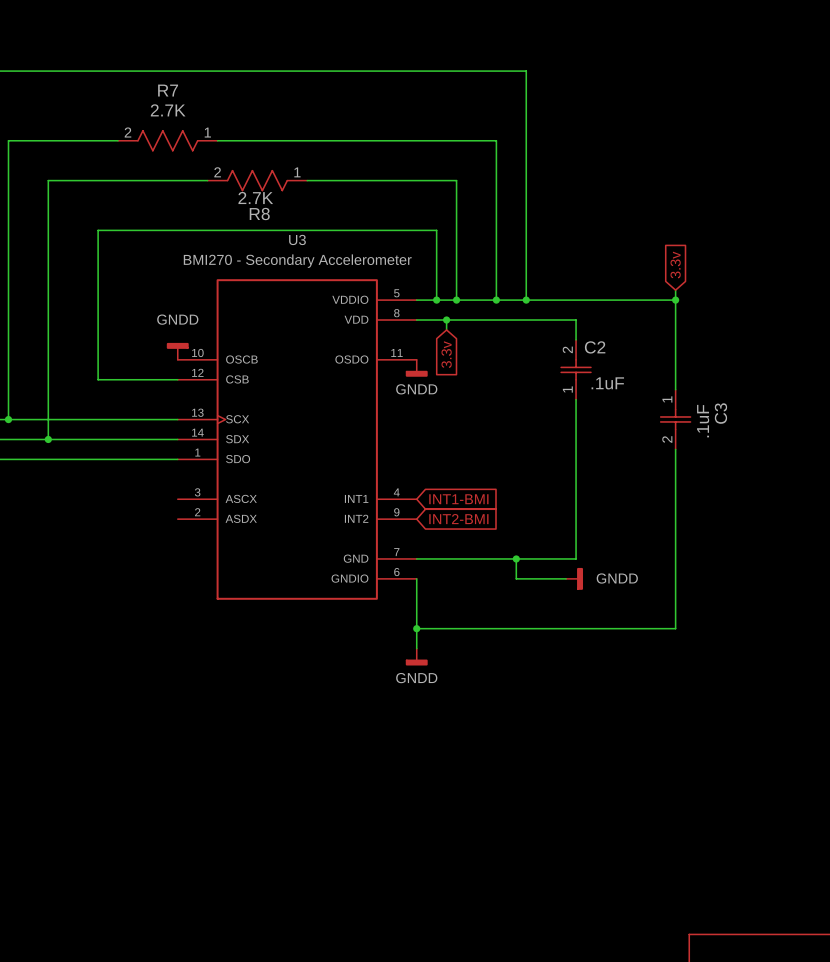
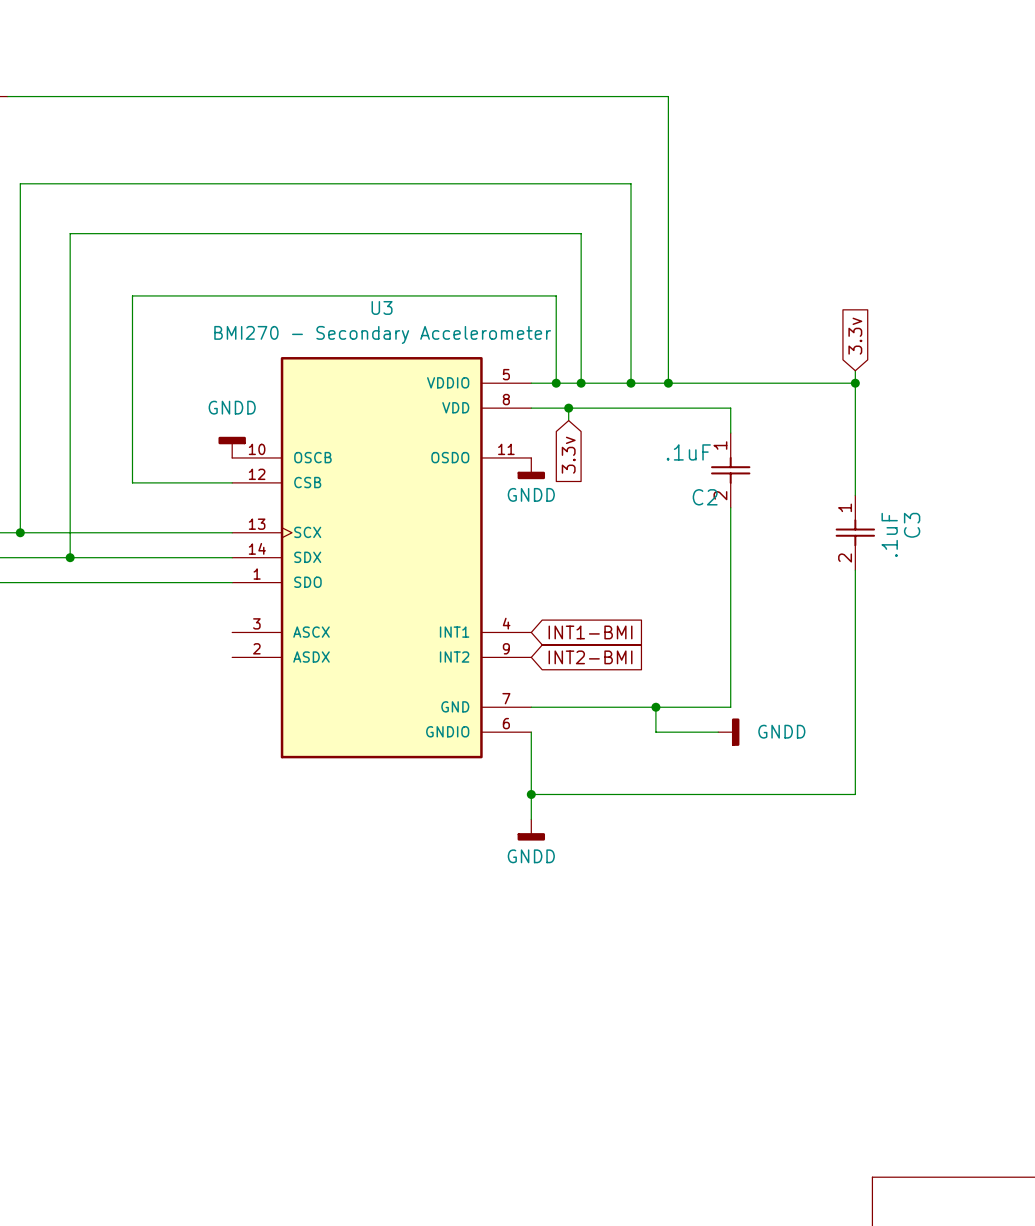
wire: none -> (157, 183) (282, 183)
R7: 2.7K (167, 140) -> none
wire: none -> (269, 233) (394, 233)
R8: 2.7K (257, 180) -> none
C2 rotation: 0° (576, 369) -> 180° (730, 470)

